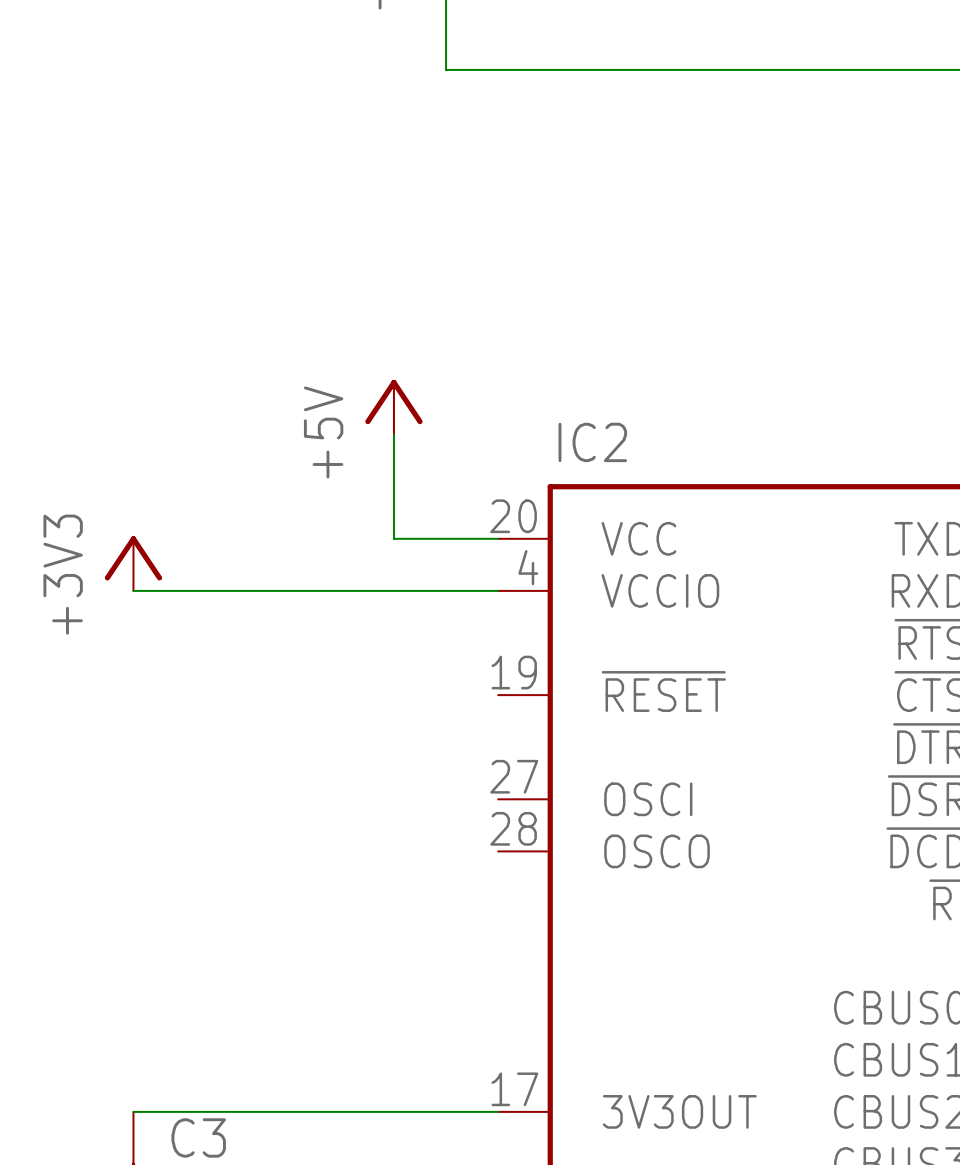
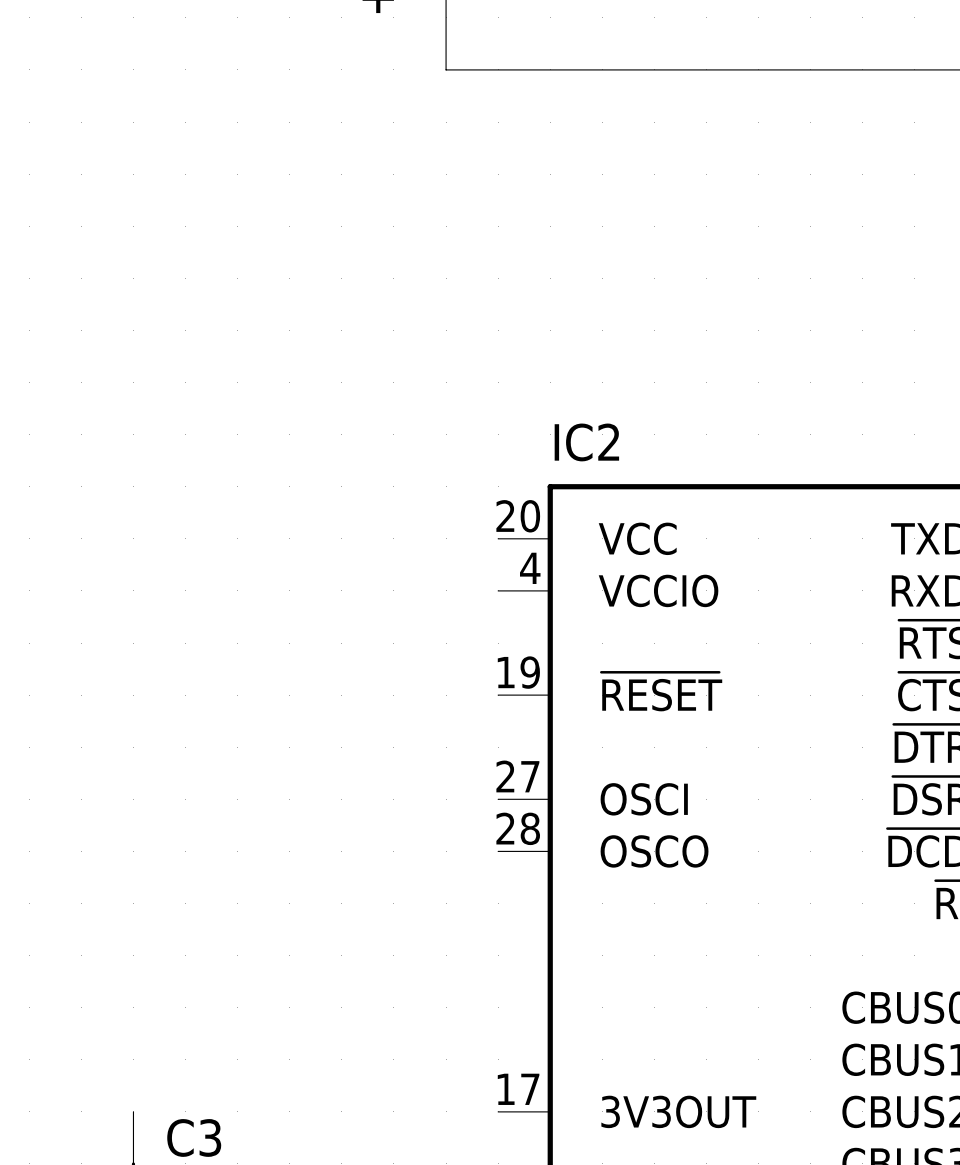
power symbol: +5V (393, 407) -> none
wire: (393, 434) (393, 538) (498, 538) -> none
power symbol: +3V3 (133, 563) -> none
wire: (133, 590) (498, 590) -> none
wire: (133, 1111) (498, 1111) -> none

